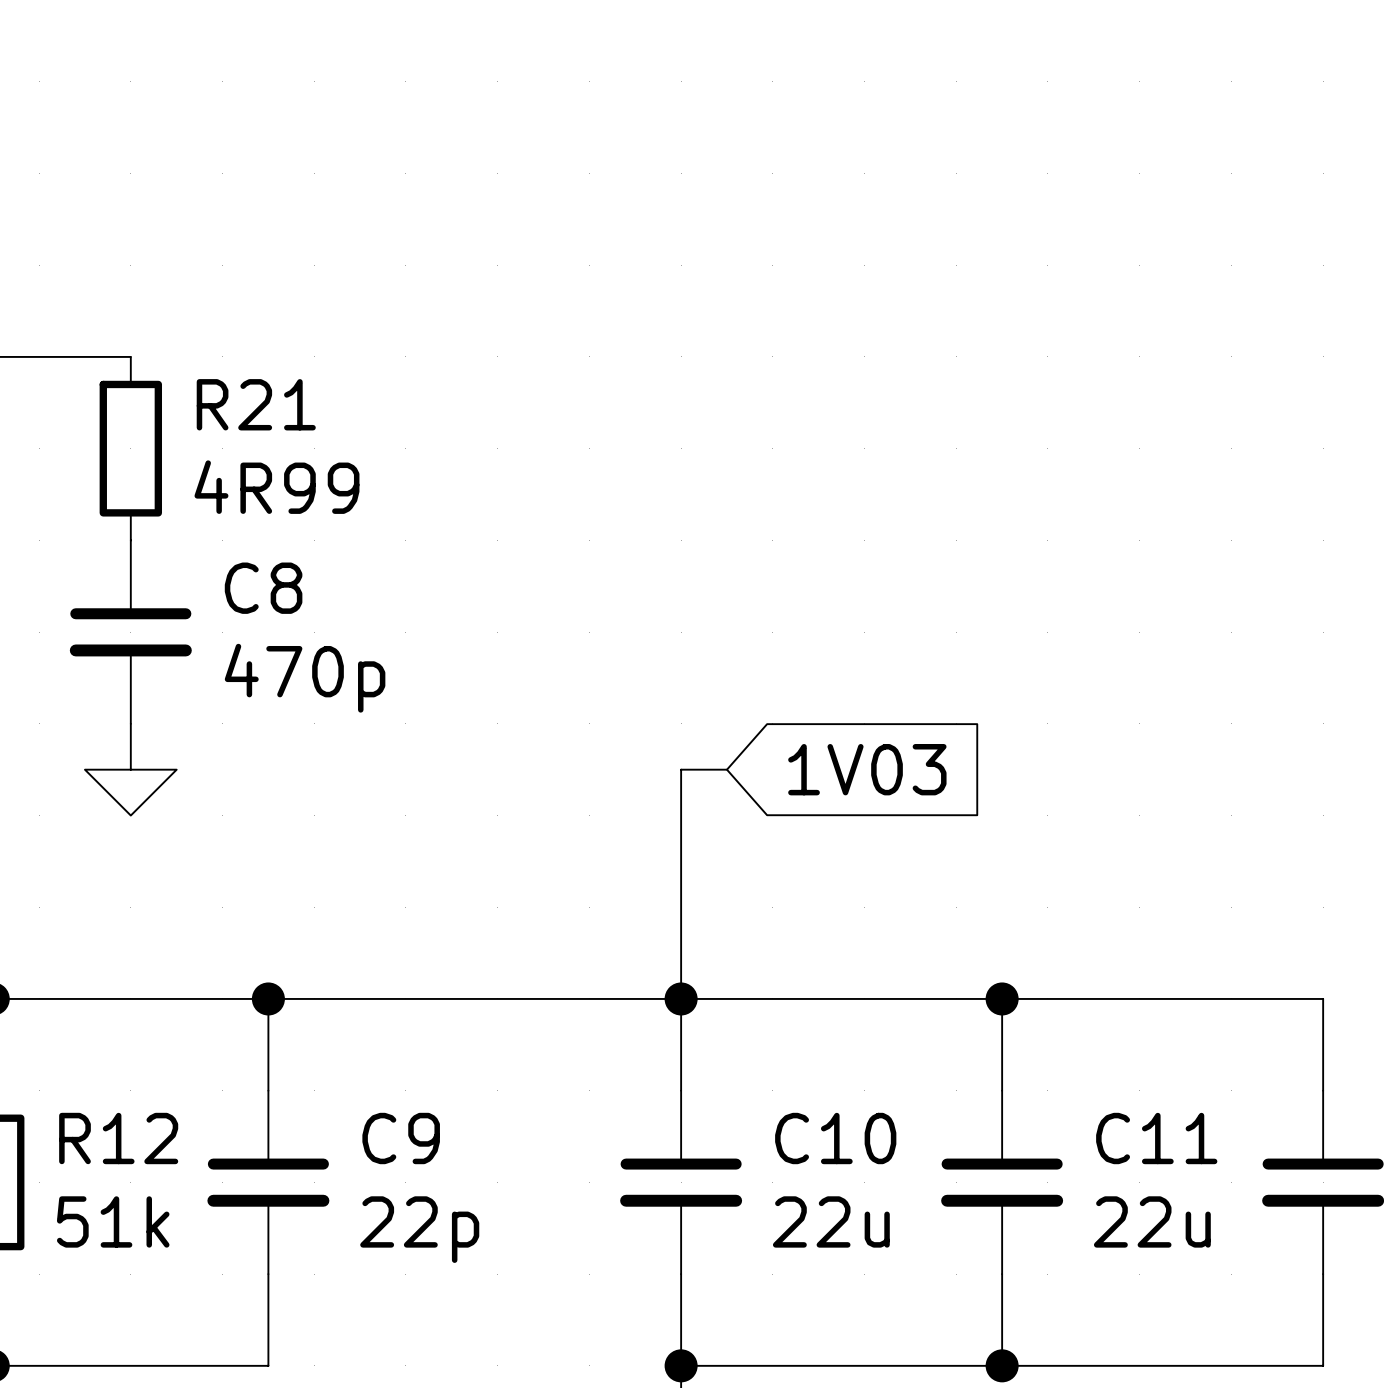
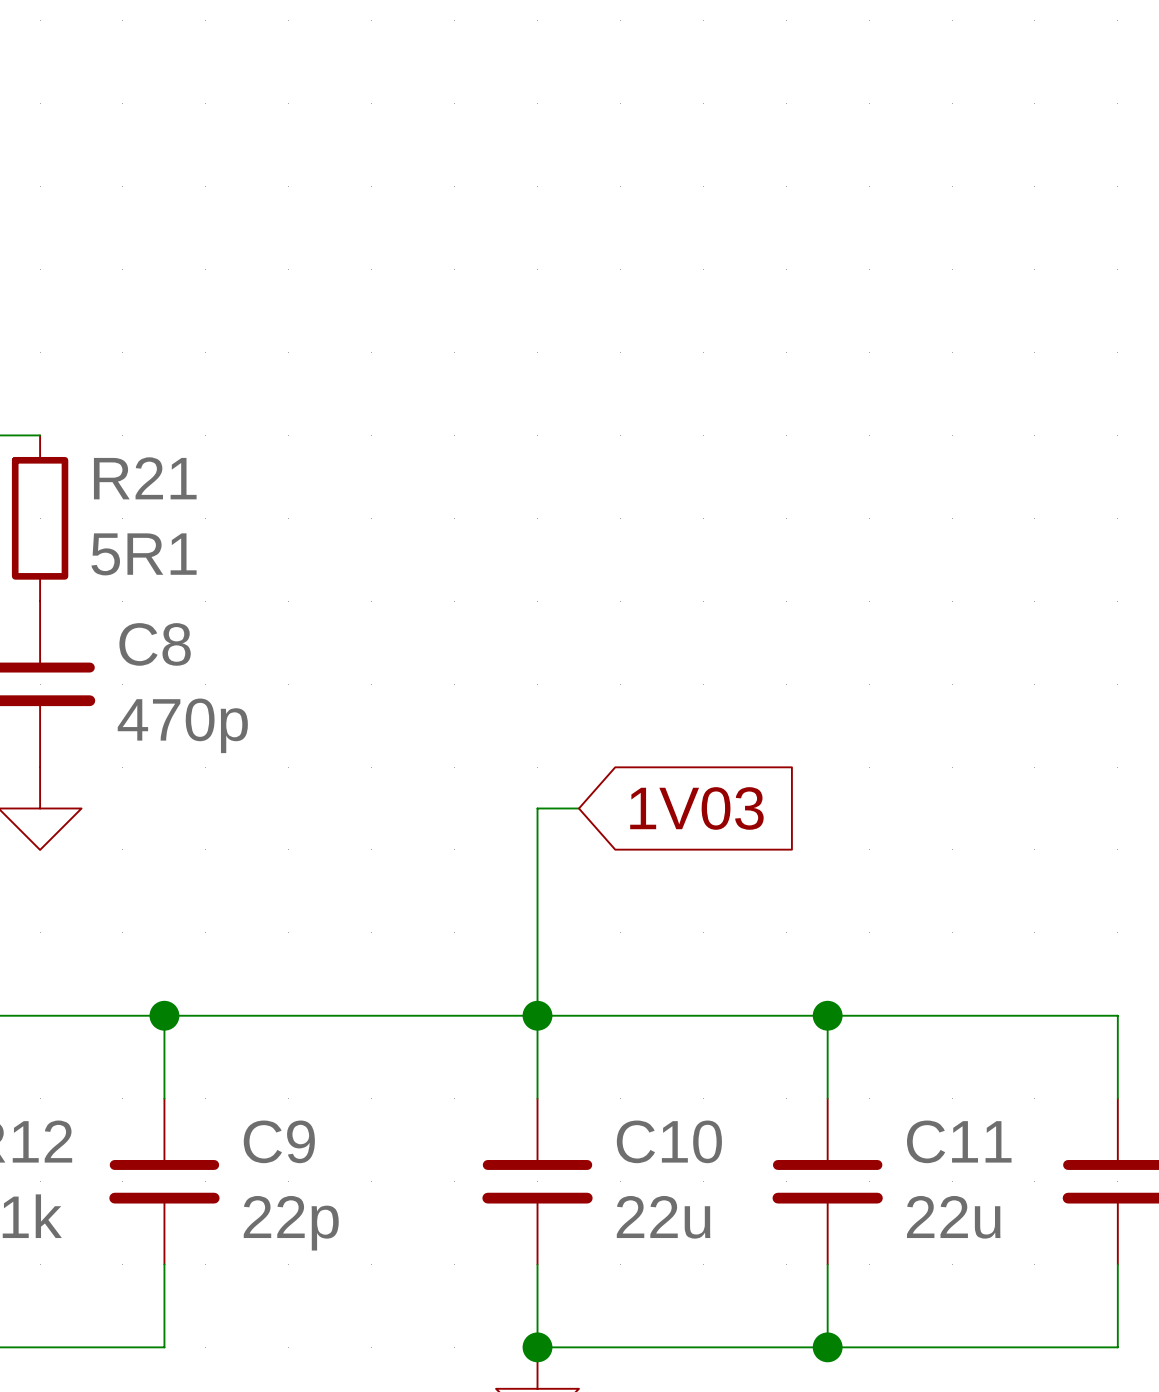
R21 value: 4R99 (276, 487) -> 5R1 (144, 554)

